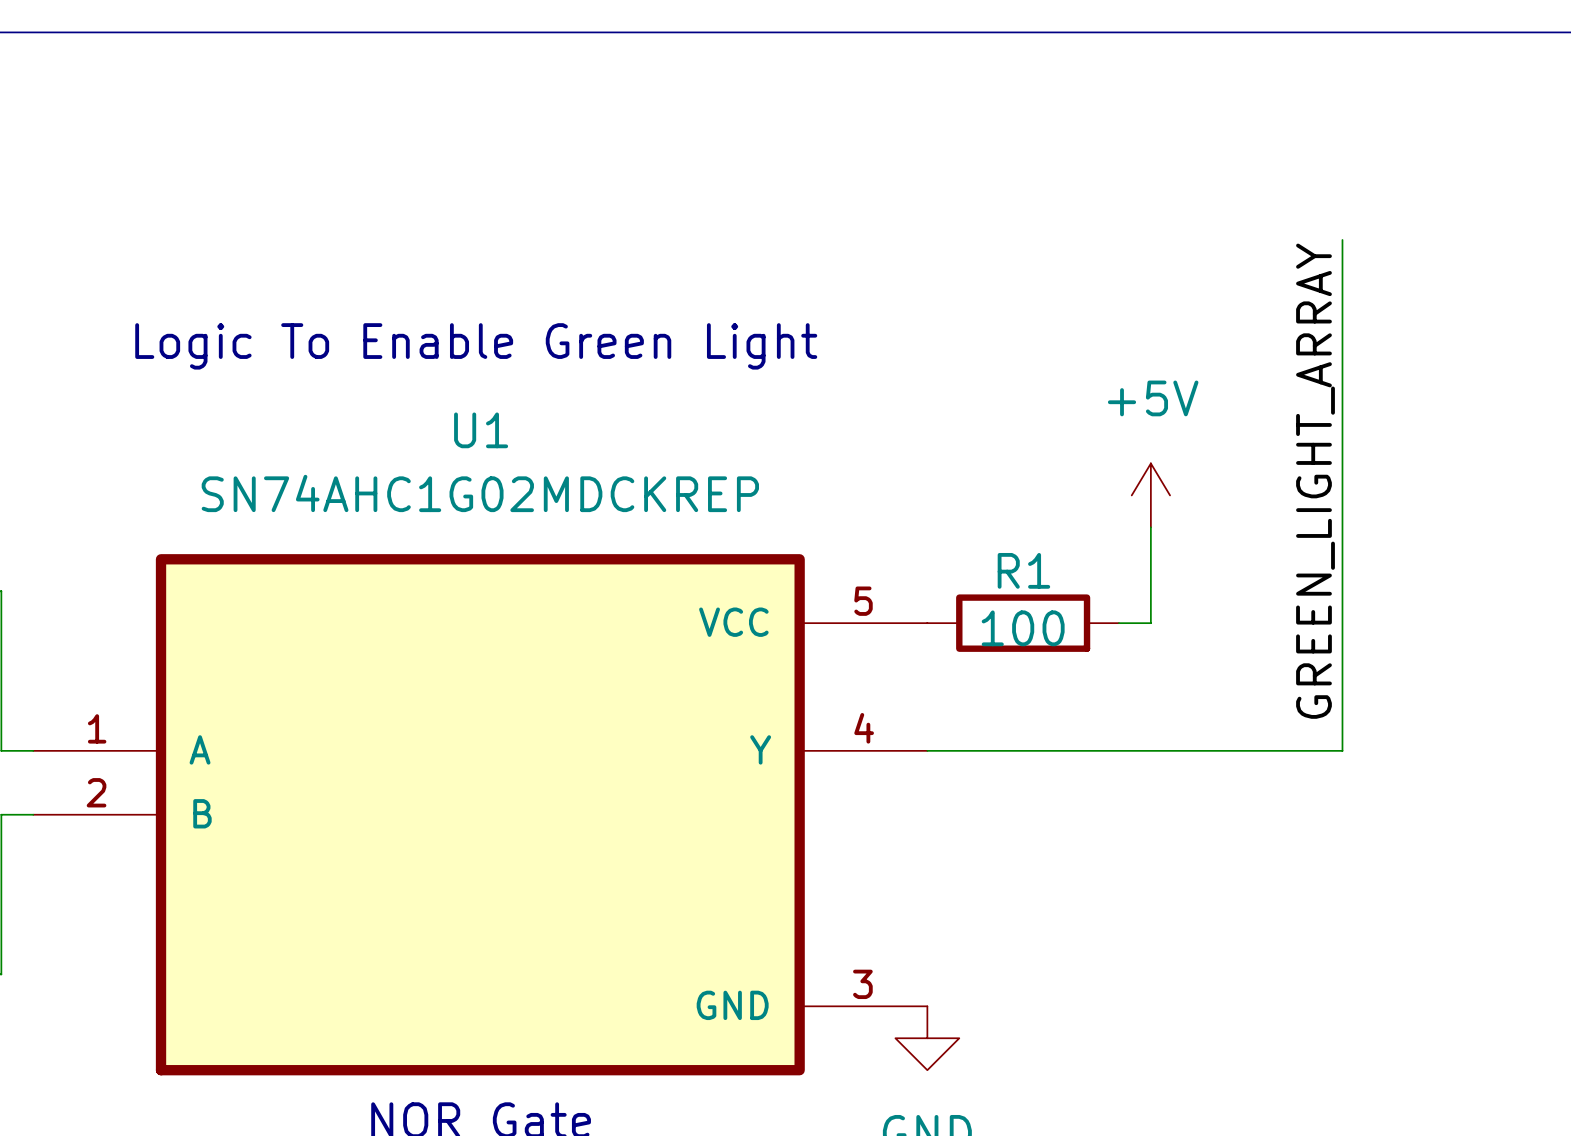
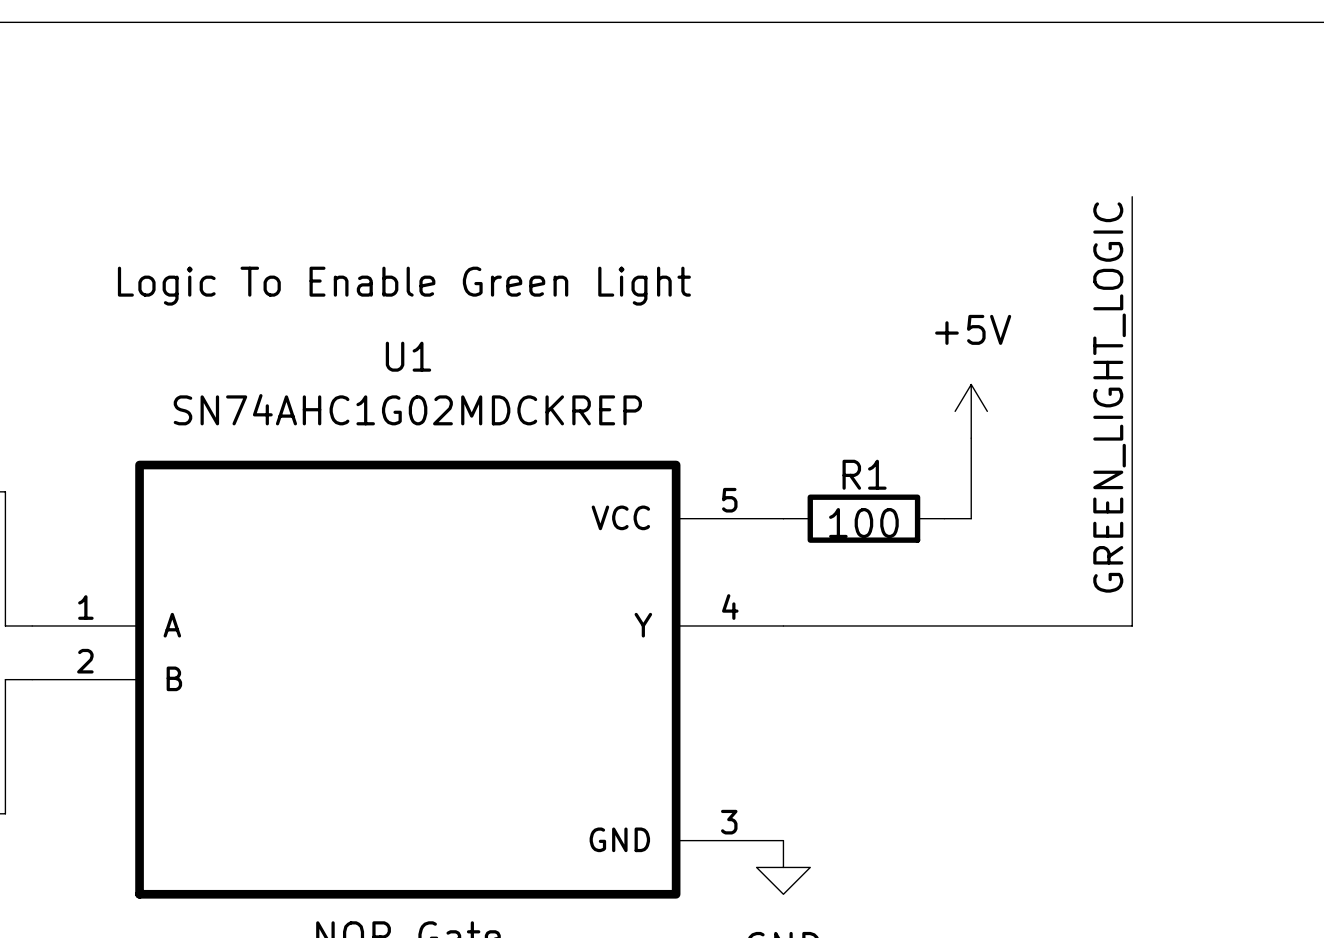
label: GREEN_LIGHT_ARRAY (1315, 481) -> GREEN_LIGHT_LOGIC (1109, 397)

